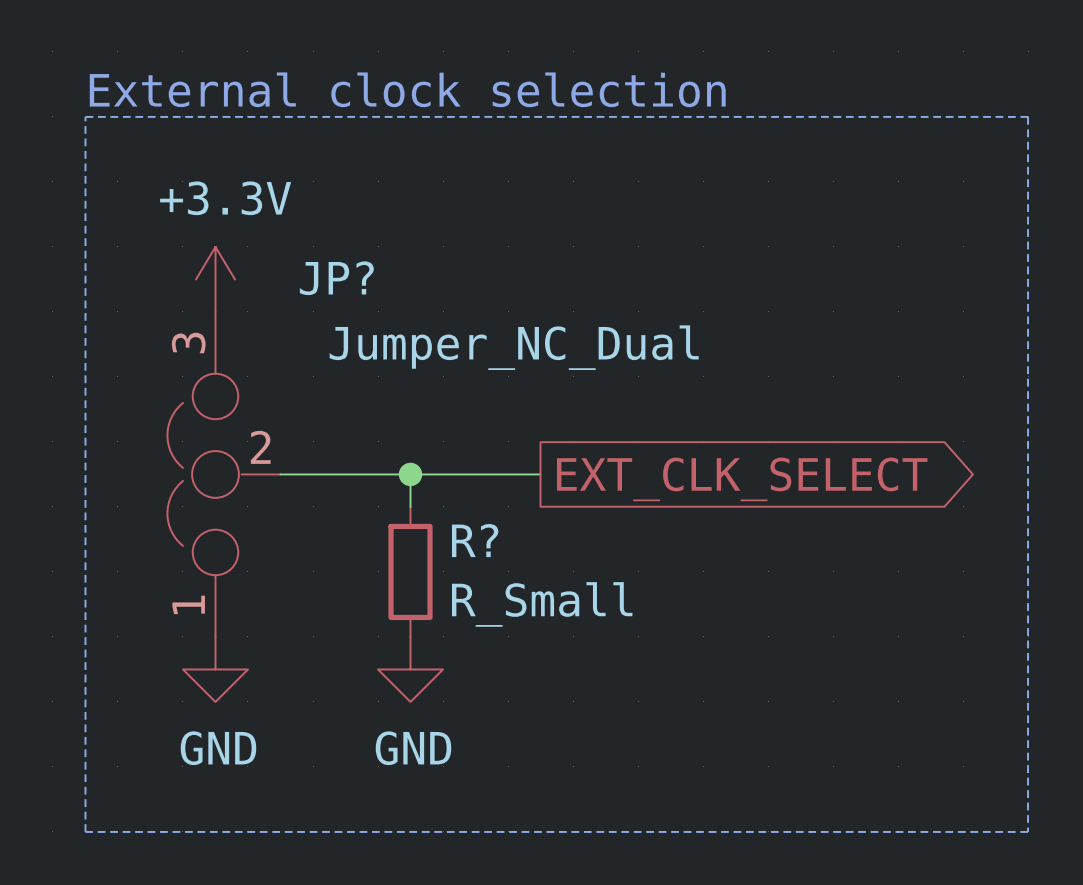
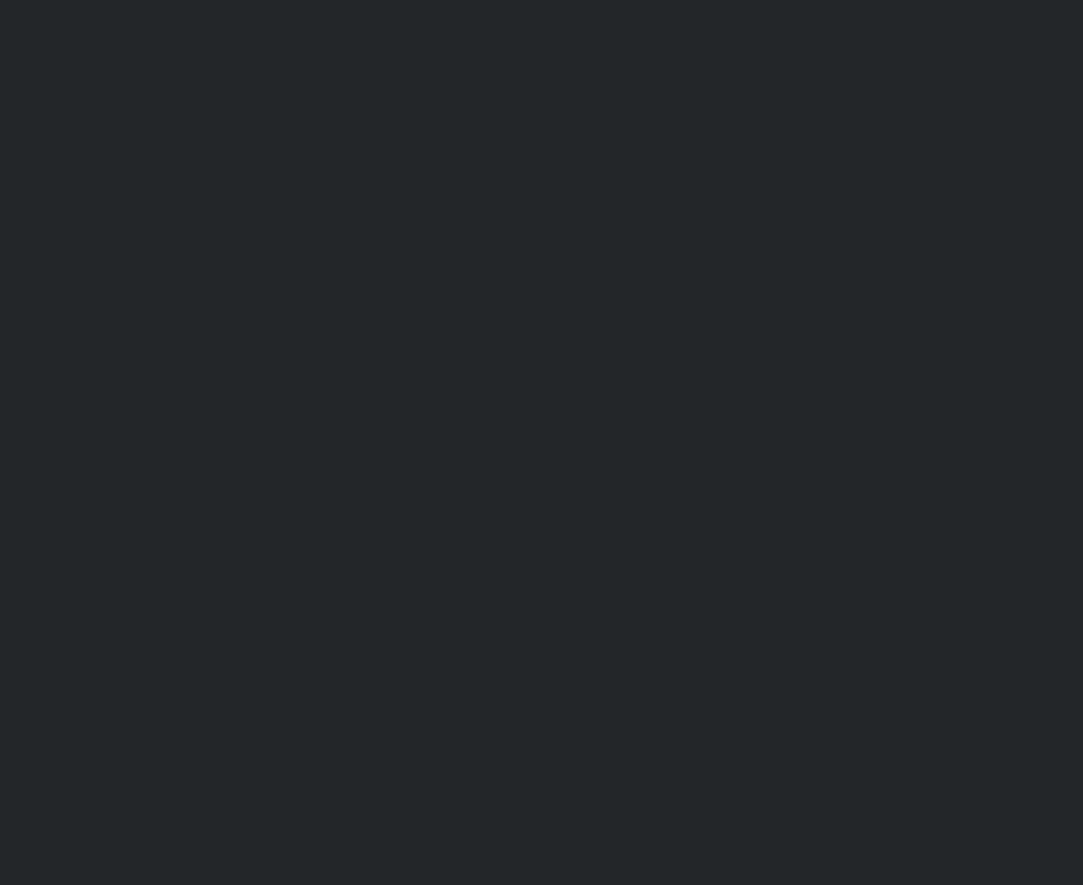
text: External clock selection (407, 89) -> none
line: (85, 116) (1028, 116) (1028, 831) (85, 831) (85, 116) -> none
power symbol: +3.3V (215, 279) -> none
JP?: Jumper_NC_Dual (223, 474) -> none
wire: (280, 474) (540, 474) -> none
wire: (410, 474) (410, 506) -> none
junction: (410, 474) -> none
global label: EXT_CLK_SELECT (742, 479) -> none
R?: R_Small (410, 571) -> none
power symbol: GND (215, 669) -> none
power symbol: GND (410, 669) -> none

